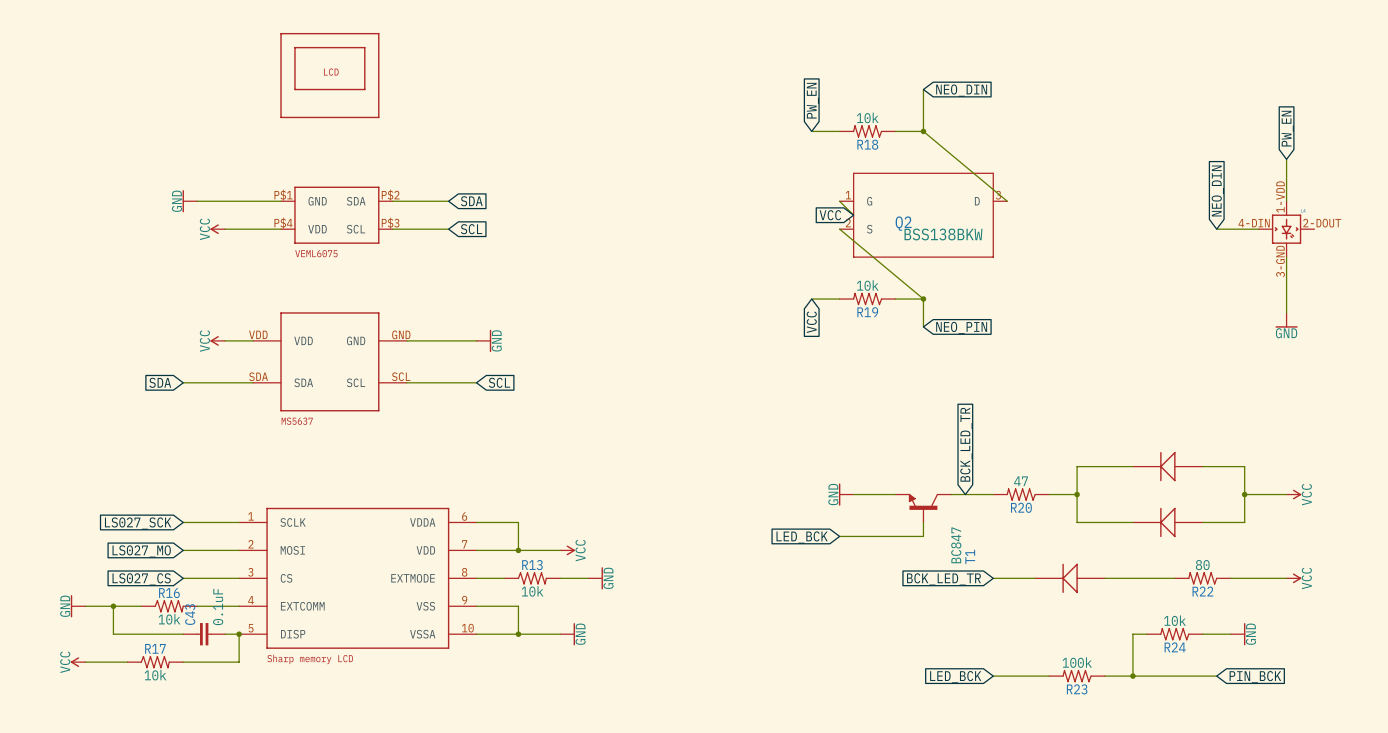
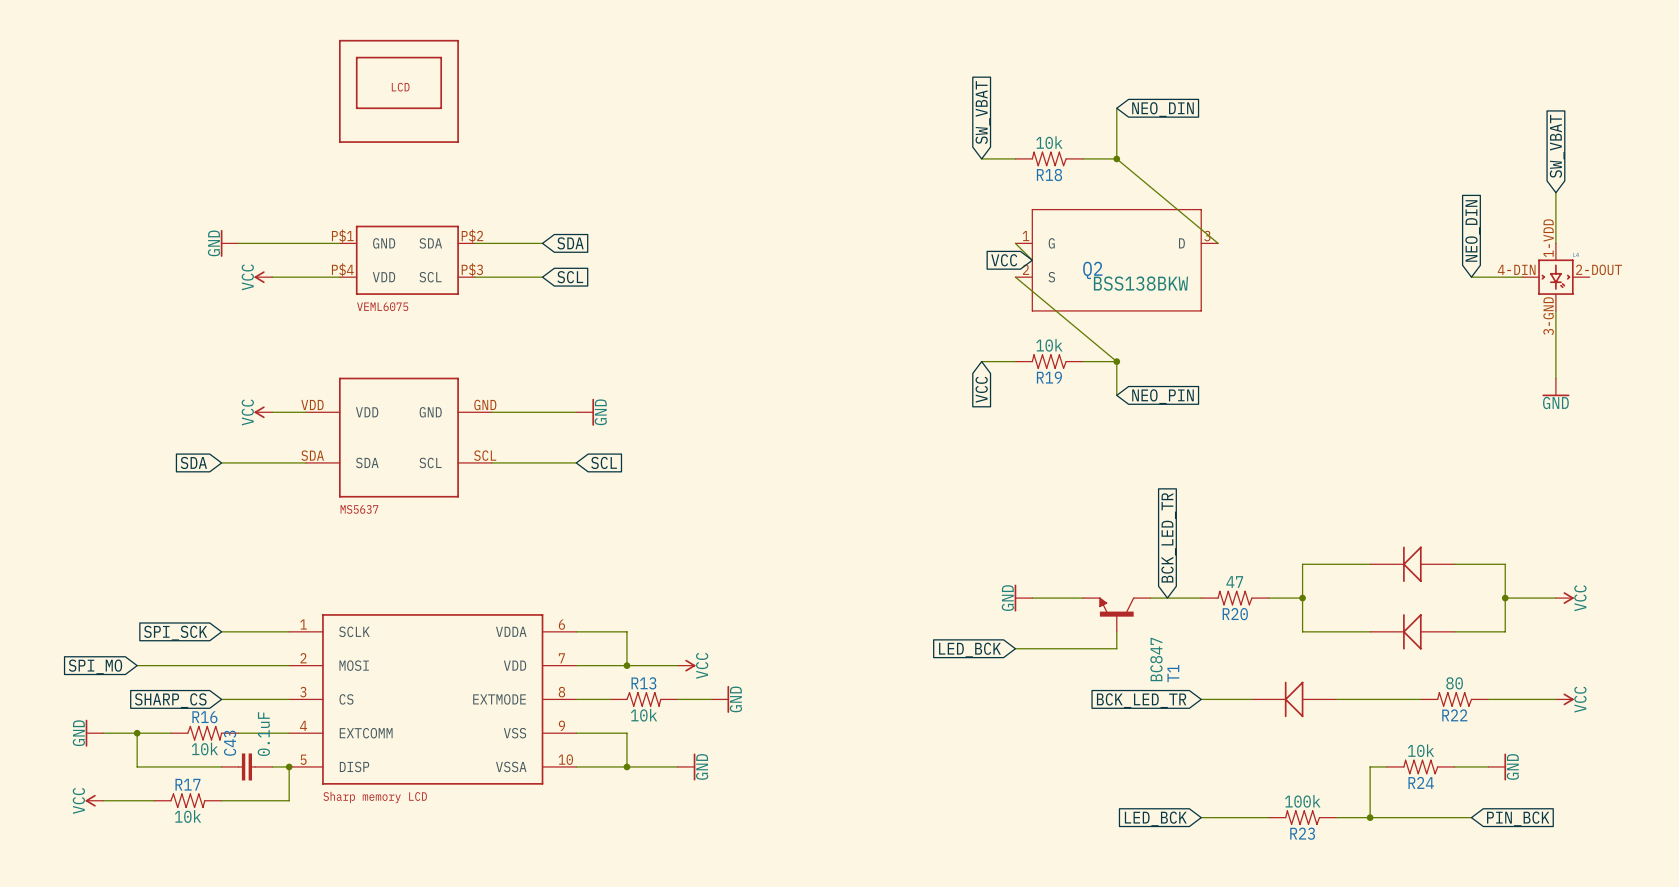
global label: PW_EN (812, 100) -> SW_VBAT (982, 112)
global label: PW_EN (1287, 128) -> SW_VBAT (1557, 146)
global label: LS027_SCK (138, 523) -> SPI_SCK (175, 633)
wire: none -> (137, 665) (221, 665)
global label: none -> SPI_MO (95, 666)
global label: LS027_MO (141, 551) -> none
global label: LS027_CS (141, 579) -> SHARP_CS (170, 700)

